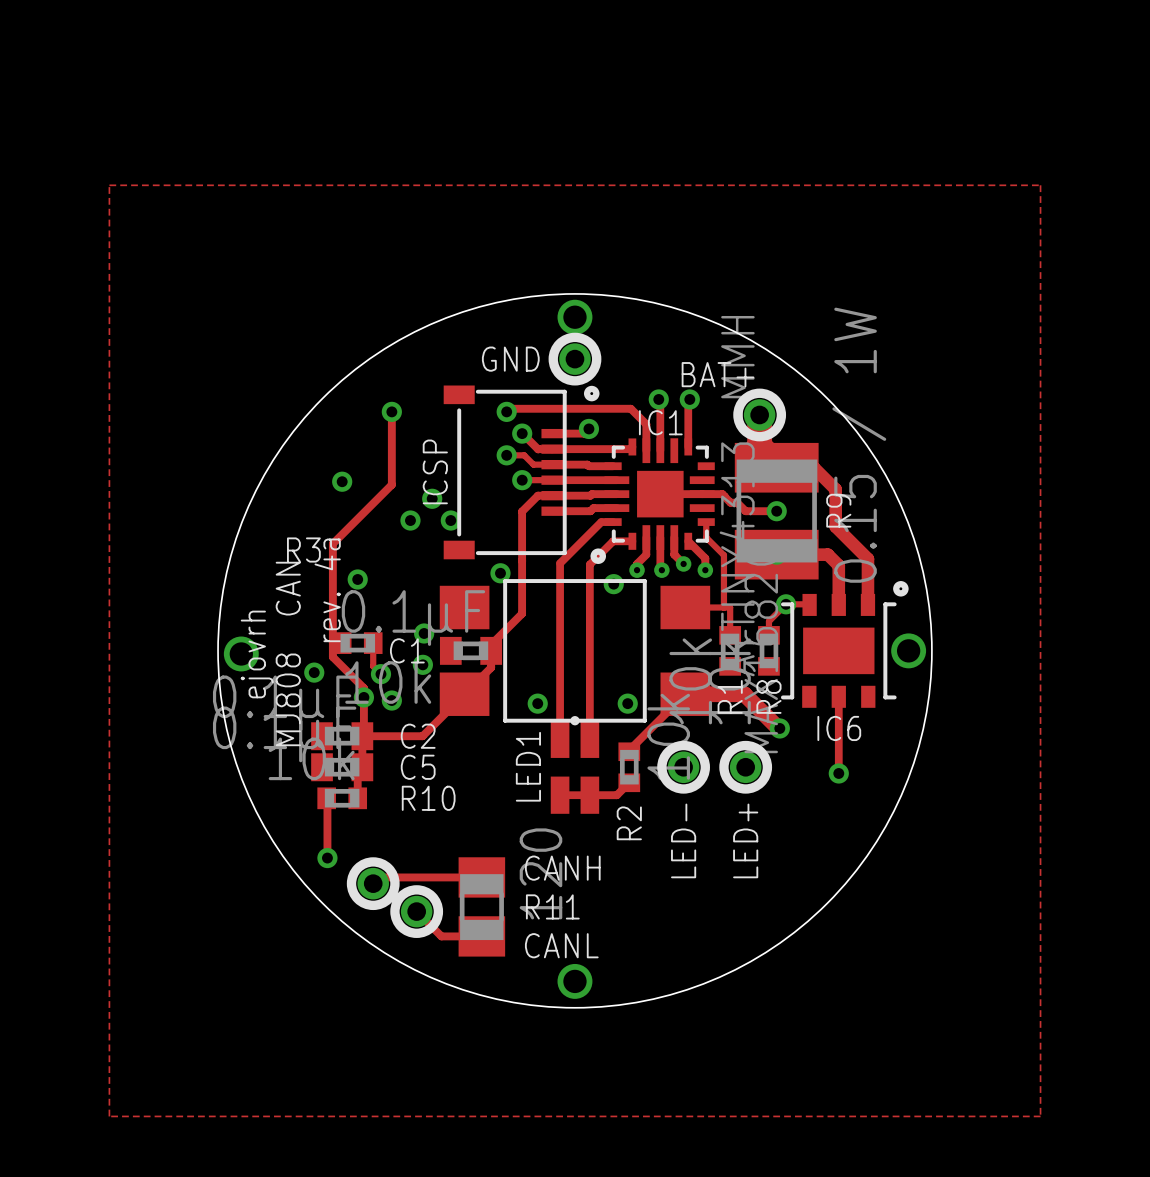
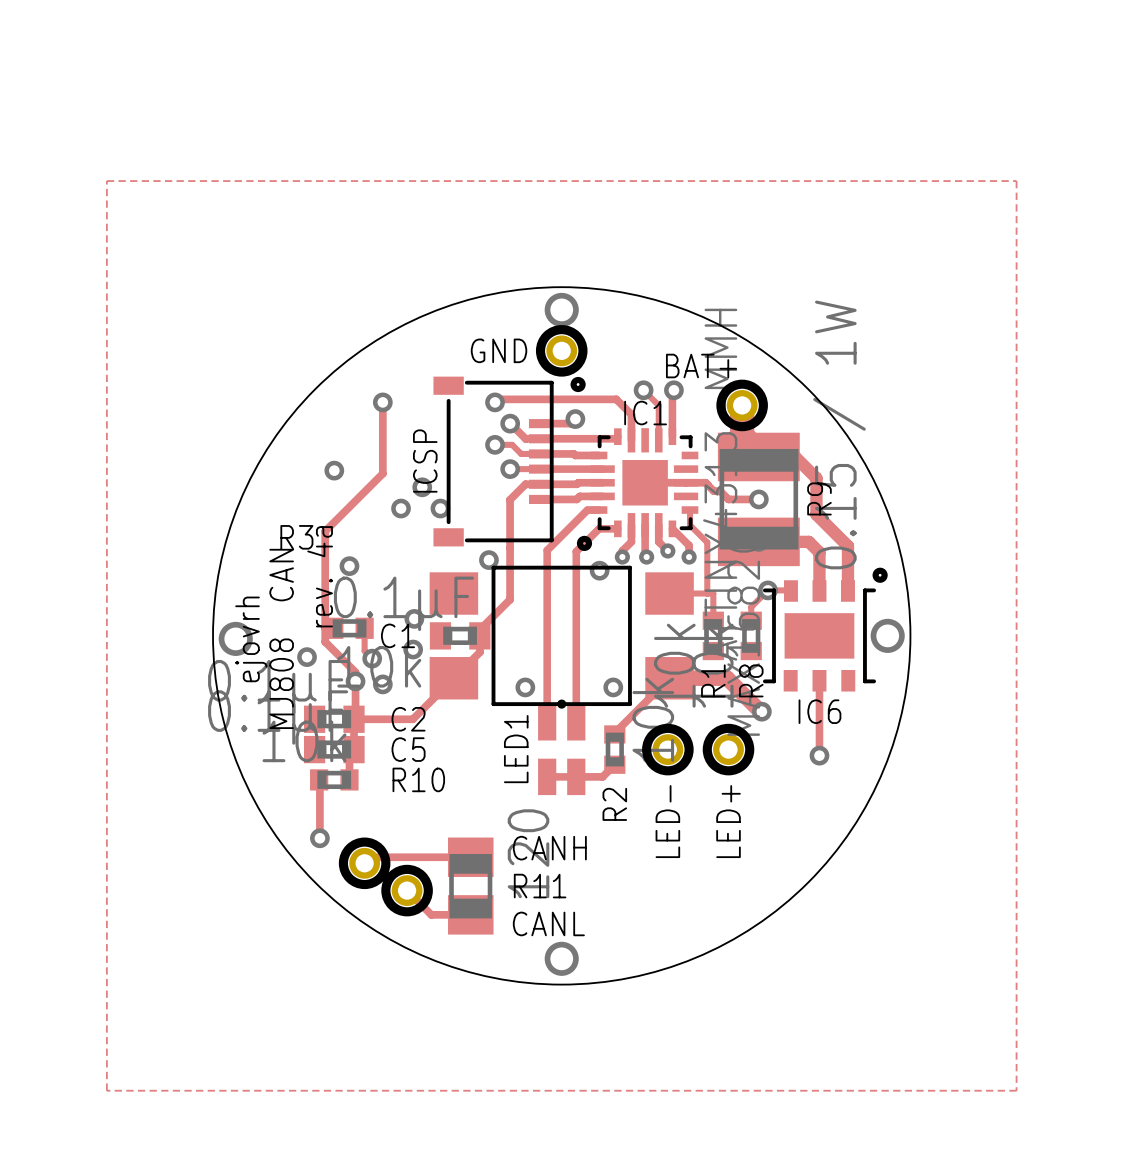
track: none -> (643, 390) (658, 405) (658, 440)
track: (660, 401) (660, 450) -> none

